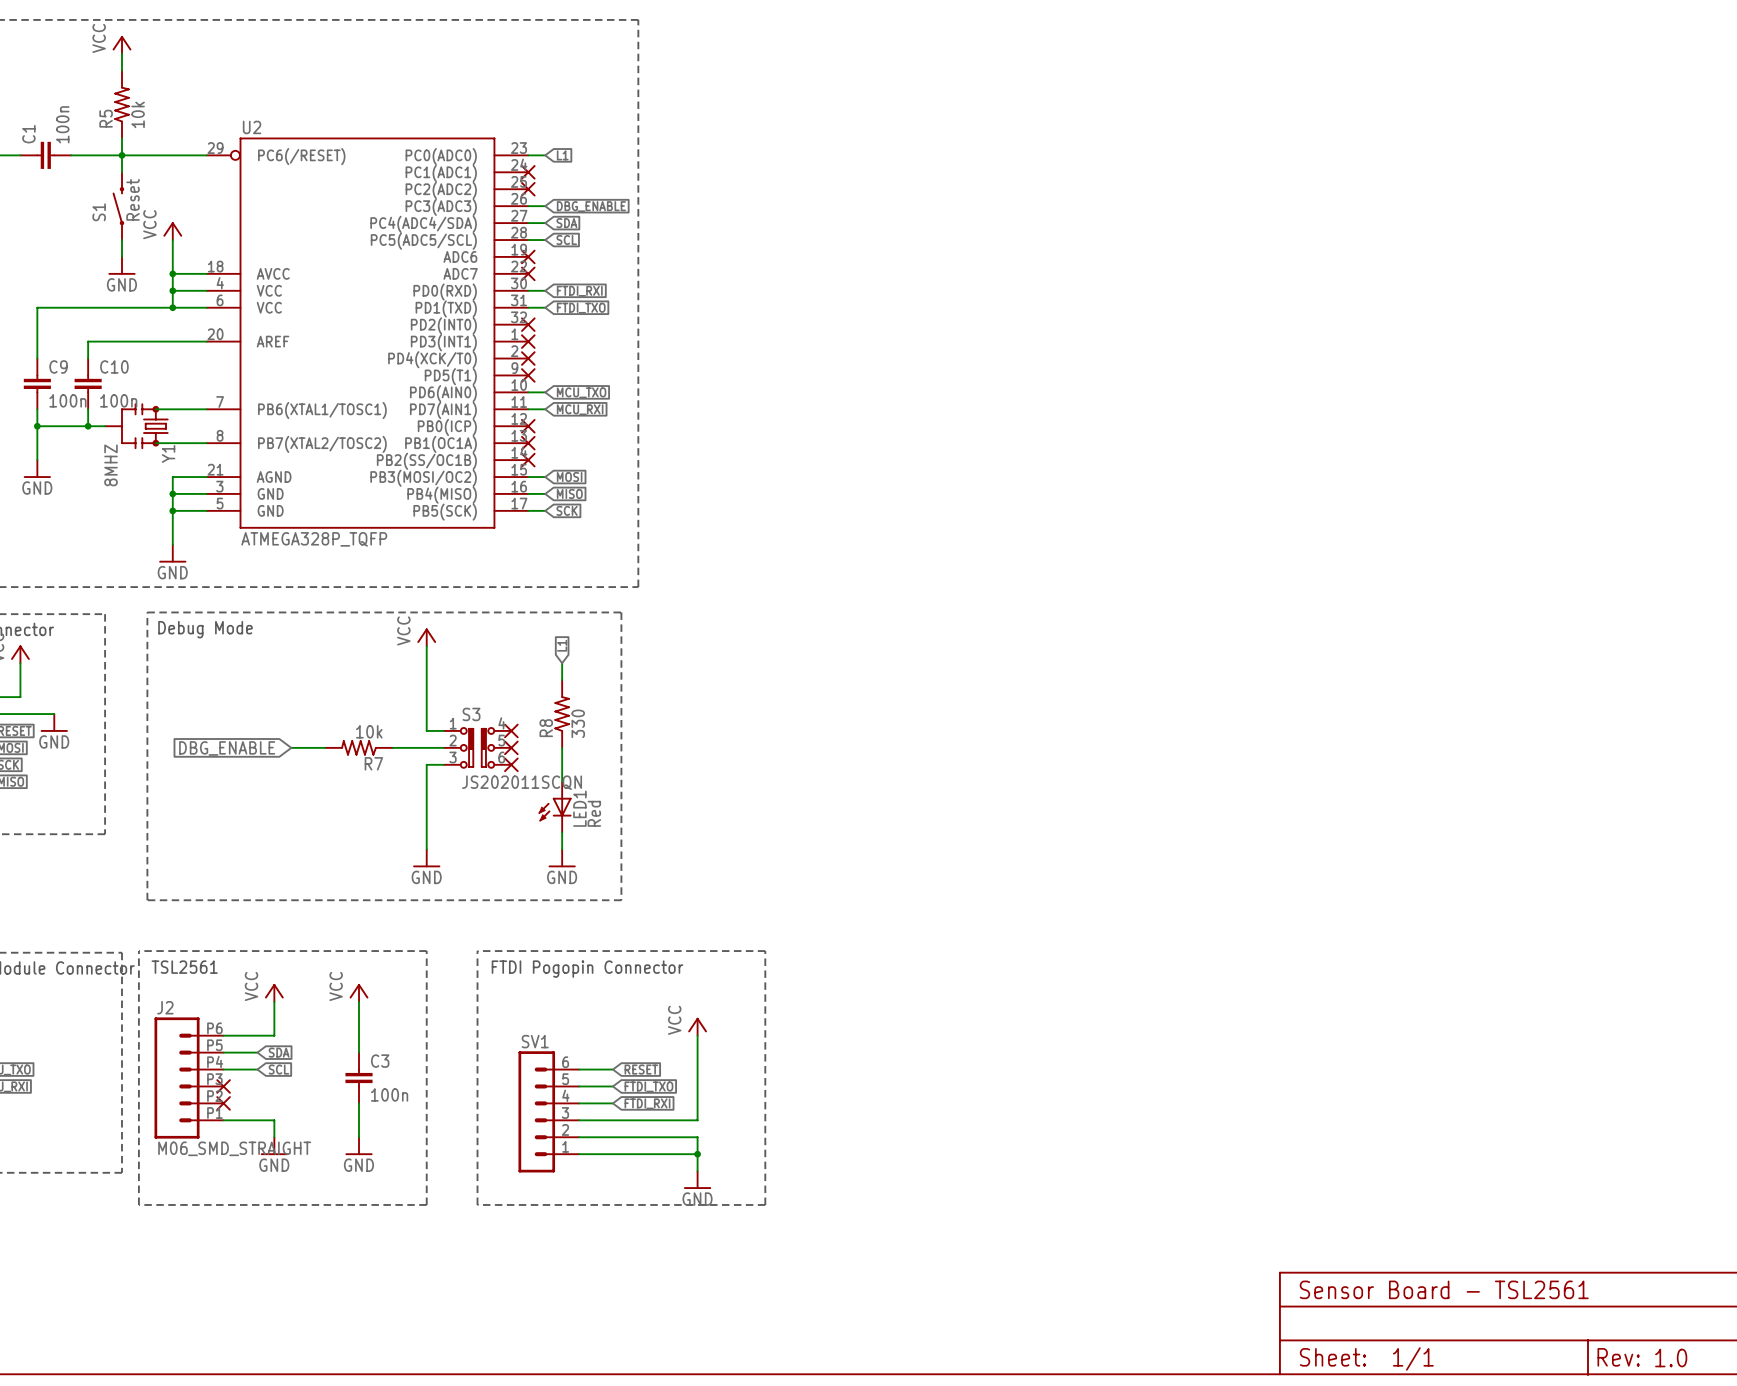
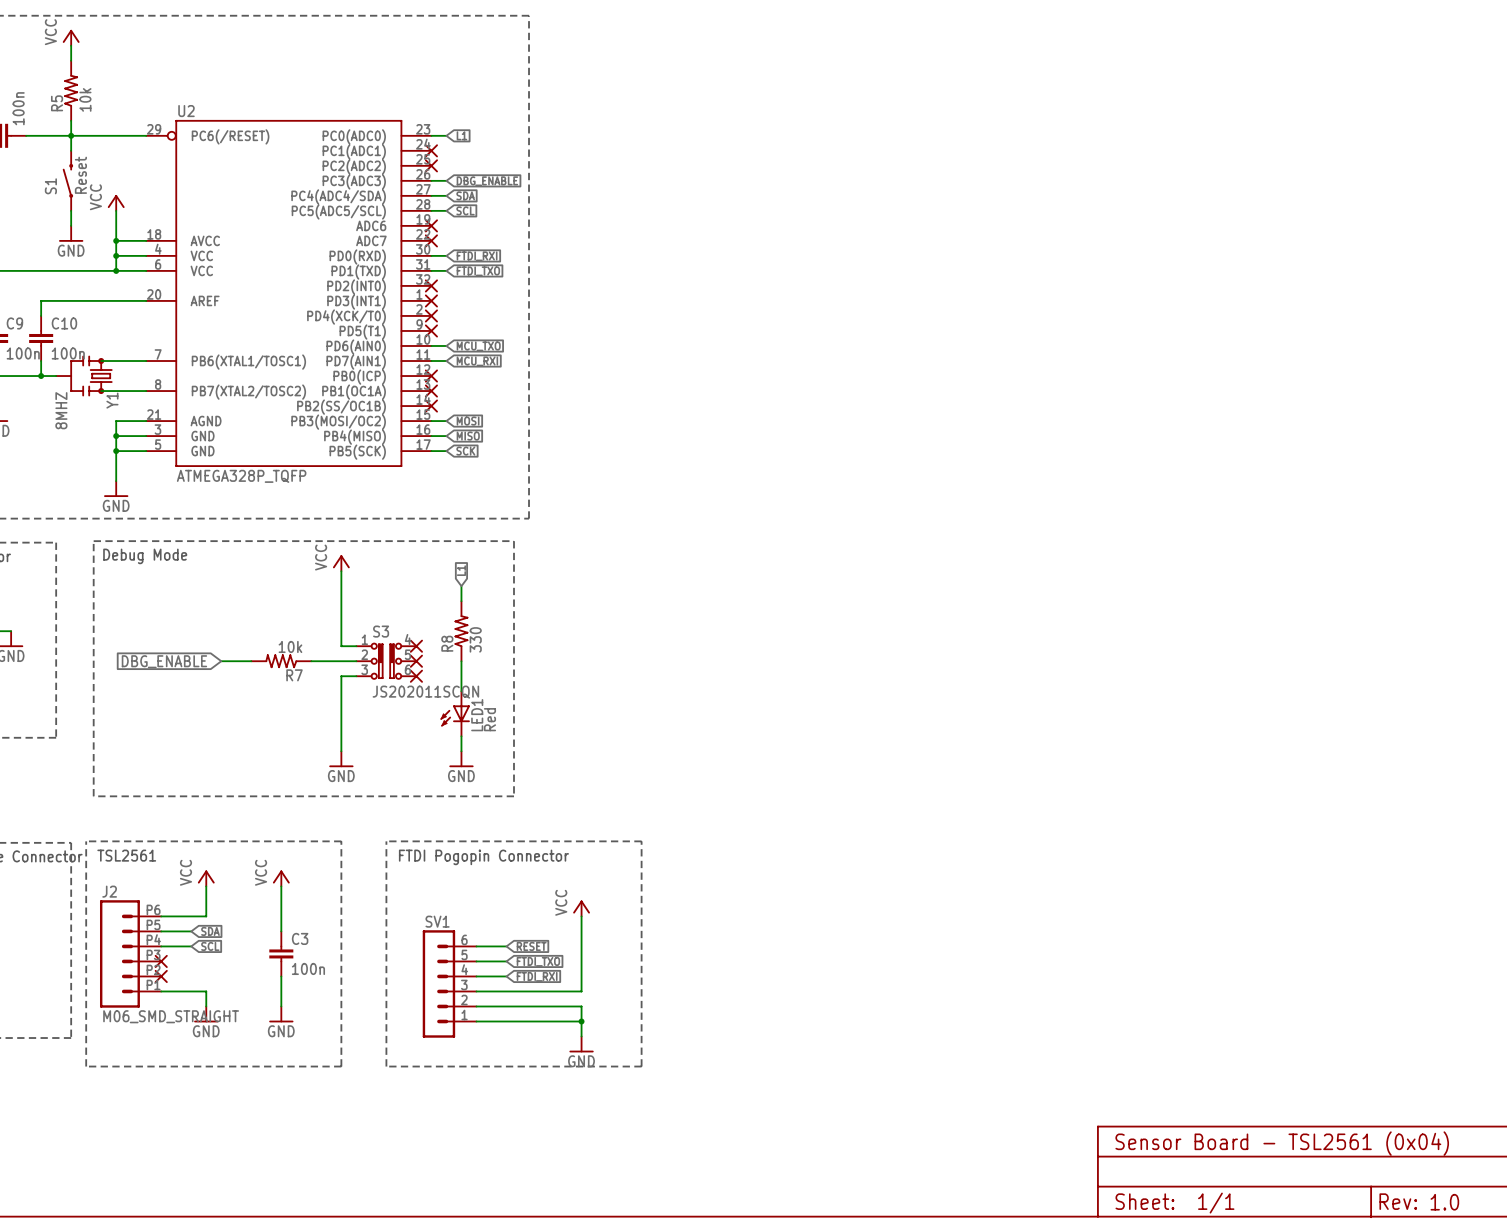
text: Sensor Board - TSL2561 (1444, 1289) -> Sensor Board - TSL2561 (0x04) (1282, 1143)

